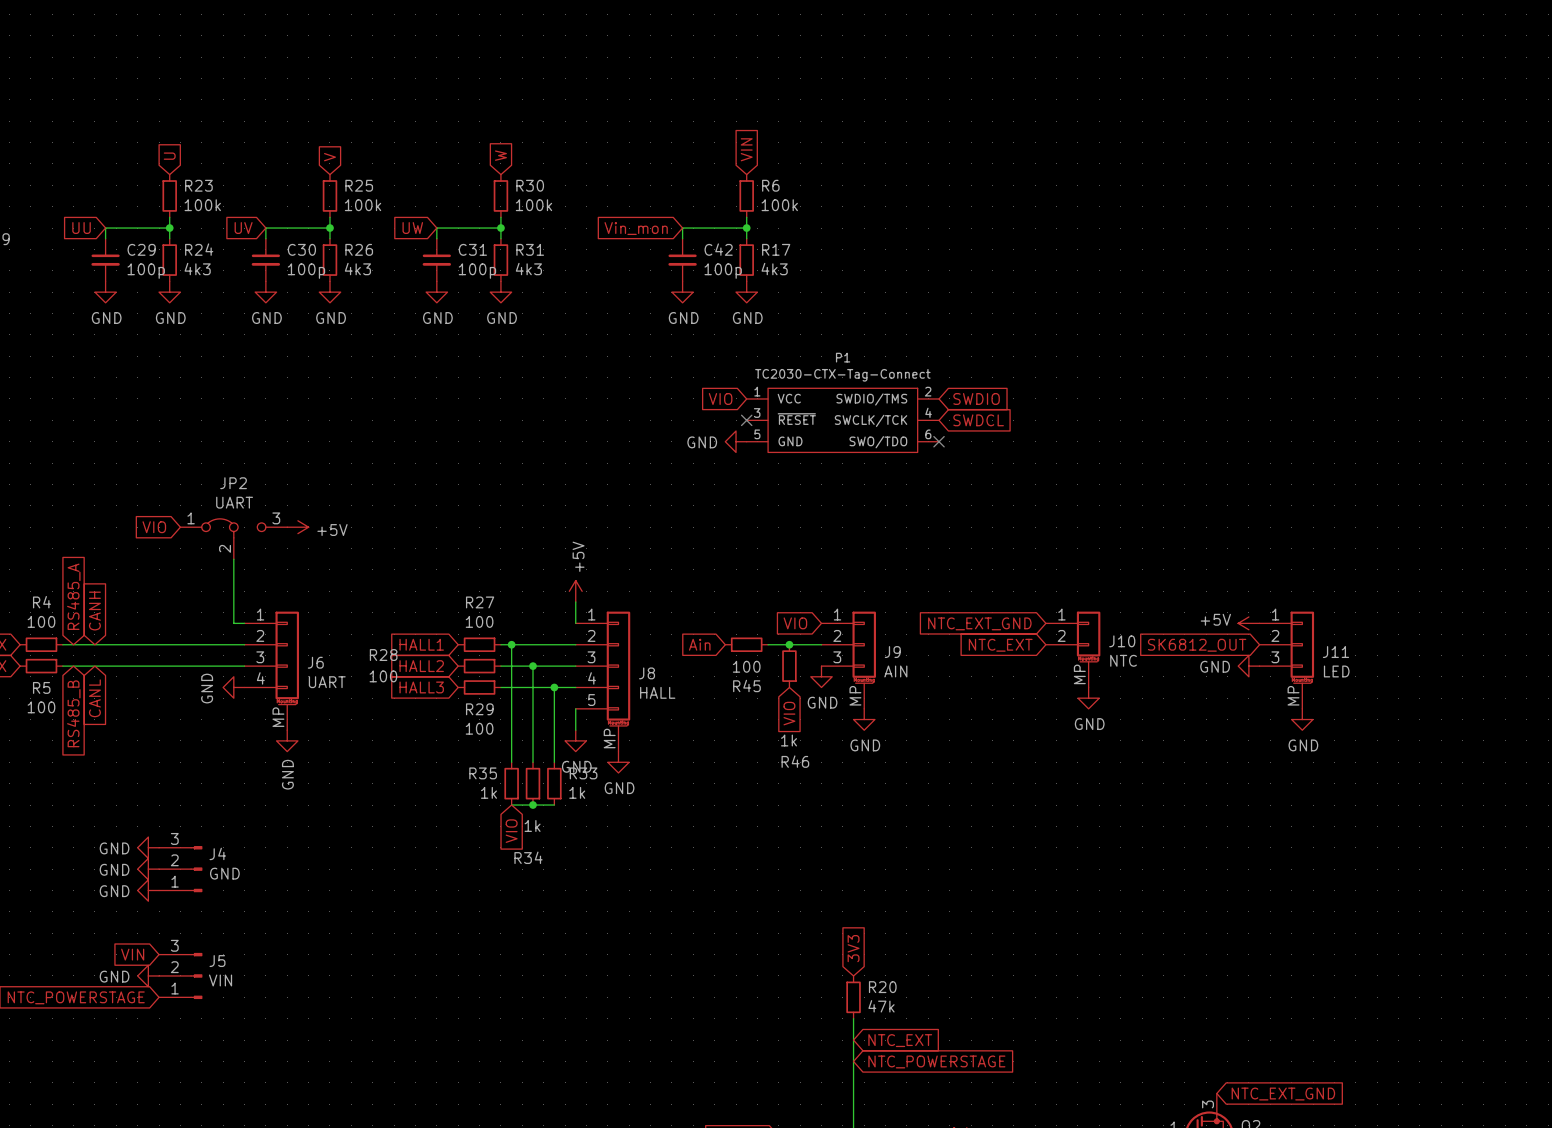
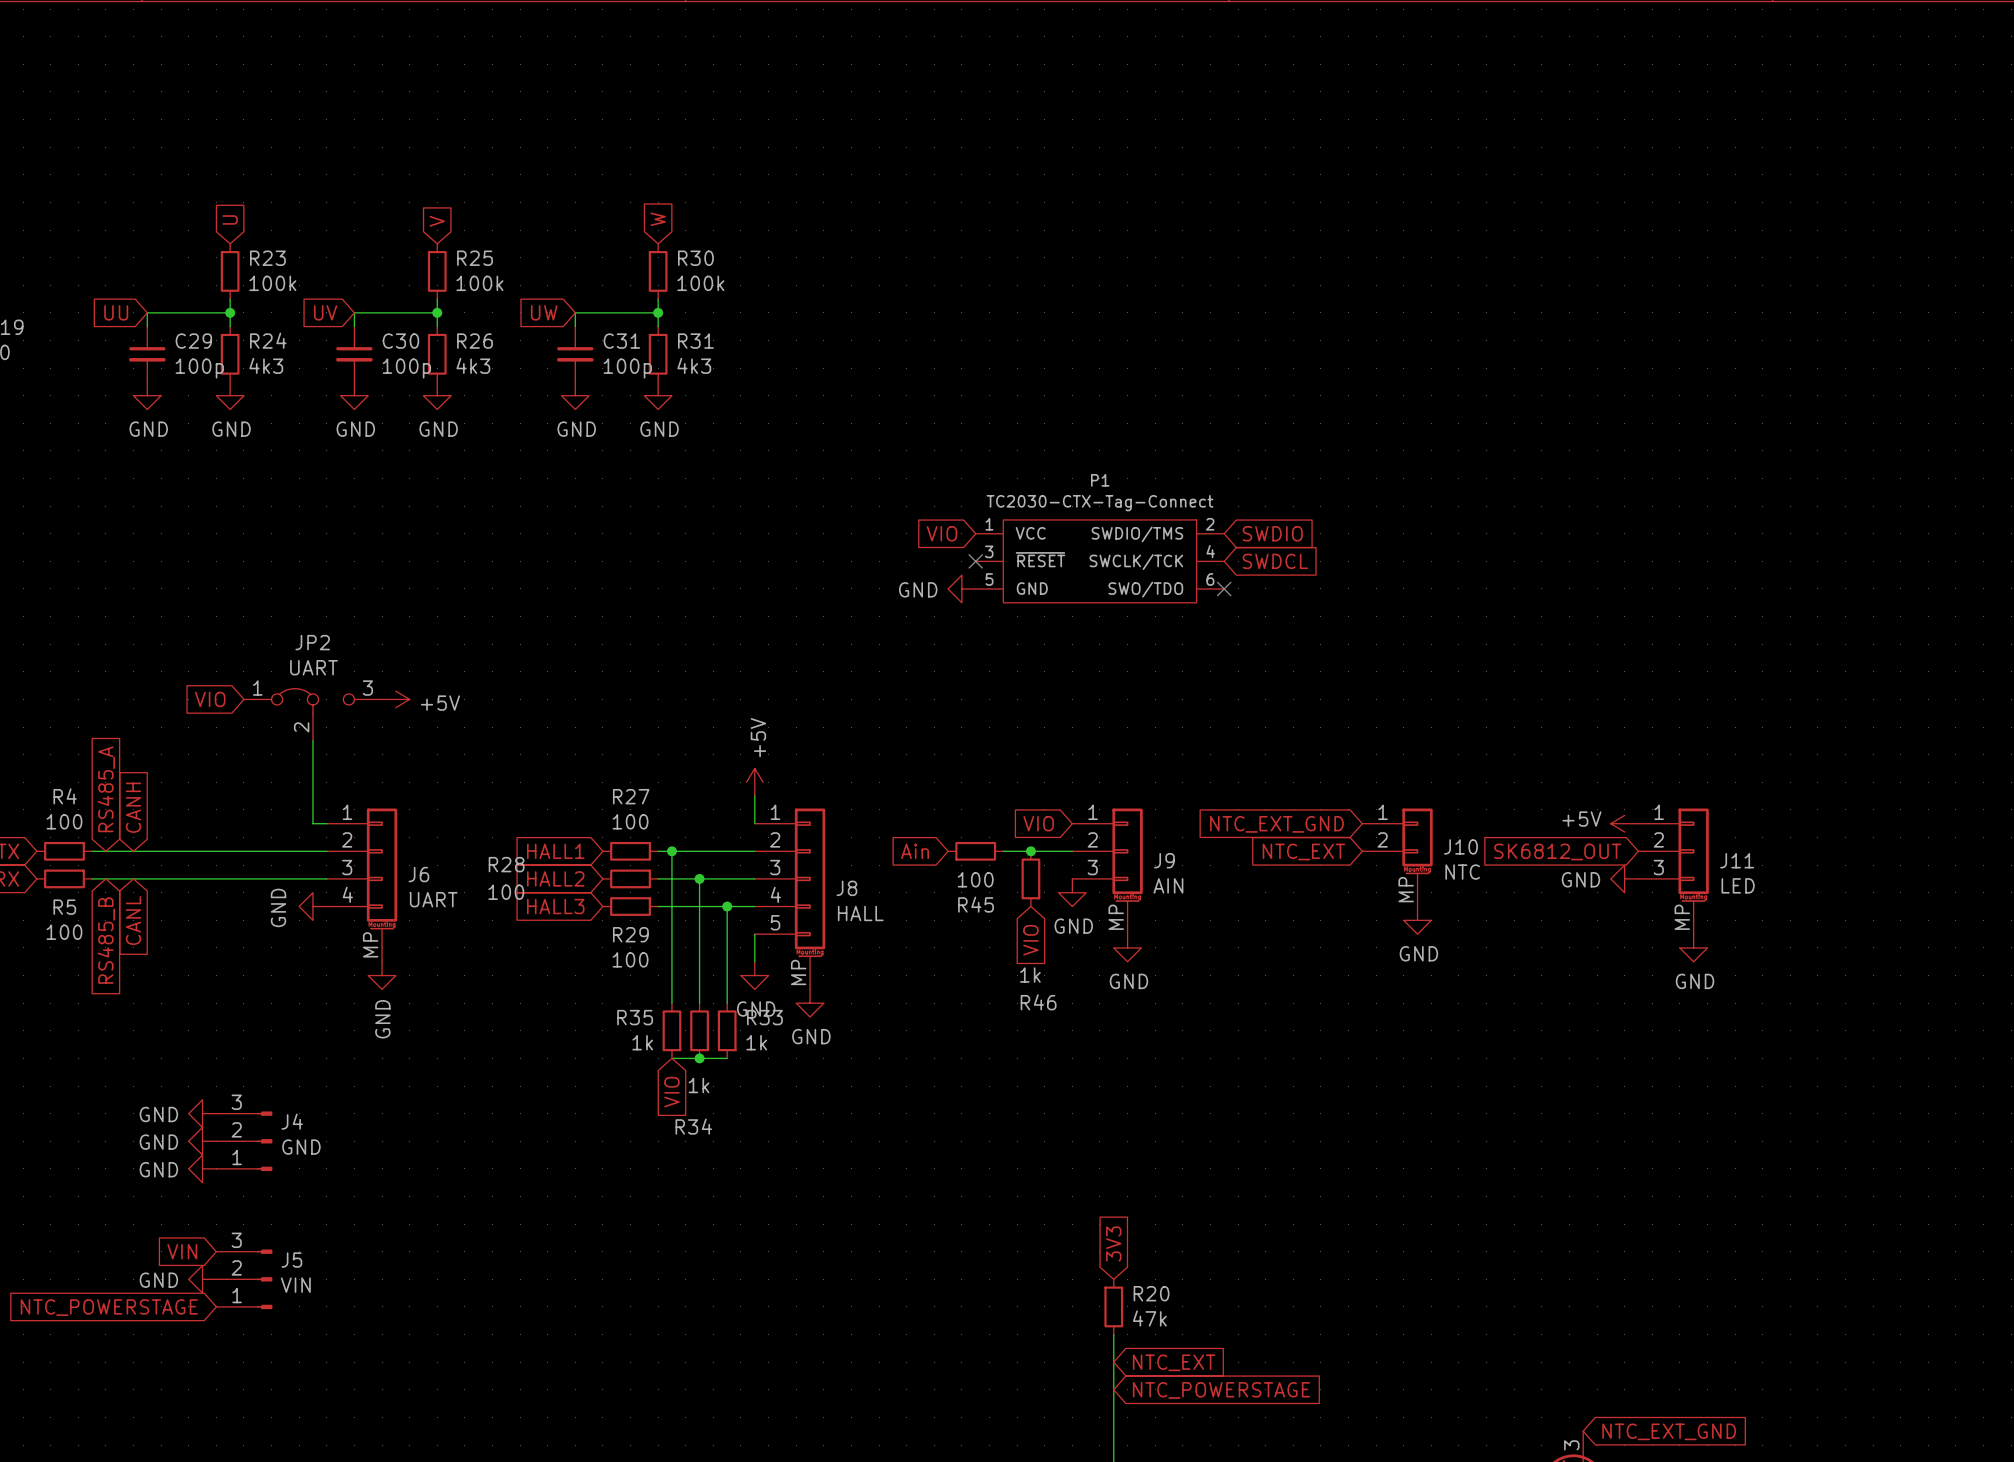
global label: VIN (746, 149) -> none
R6: 100k (746, 195) -> none
wire: (746, 217) (746, 238) -> none
global label: Vin_mon (636, 228) -> none
wire: (746, 228) (682, 228) (682, 238) -> none
junction: (746, 228) -> none
C42: 100p (682, 260) -> none
R17: 4k3 (746, 260) -> none
power symbol: GND (682, 292) -> none
power symbol: GND (746, 292) -> none

